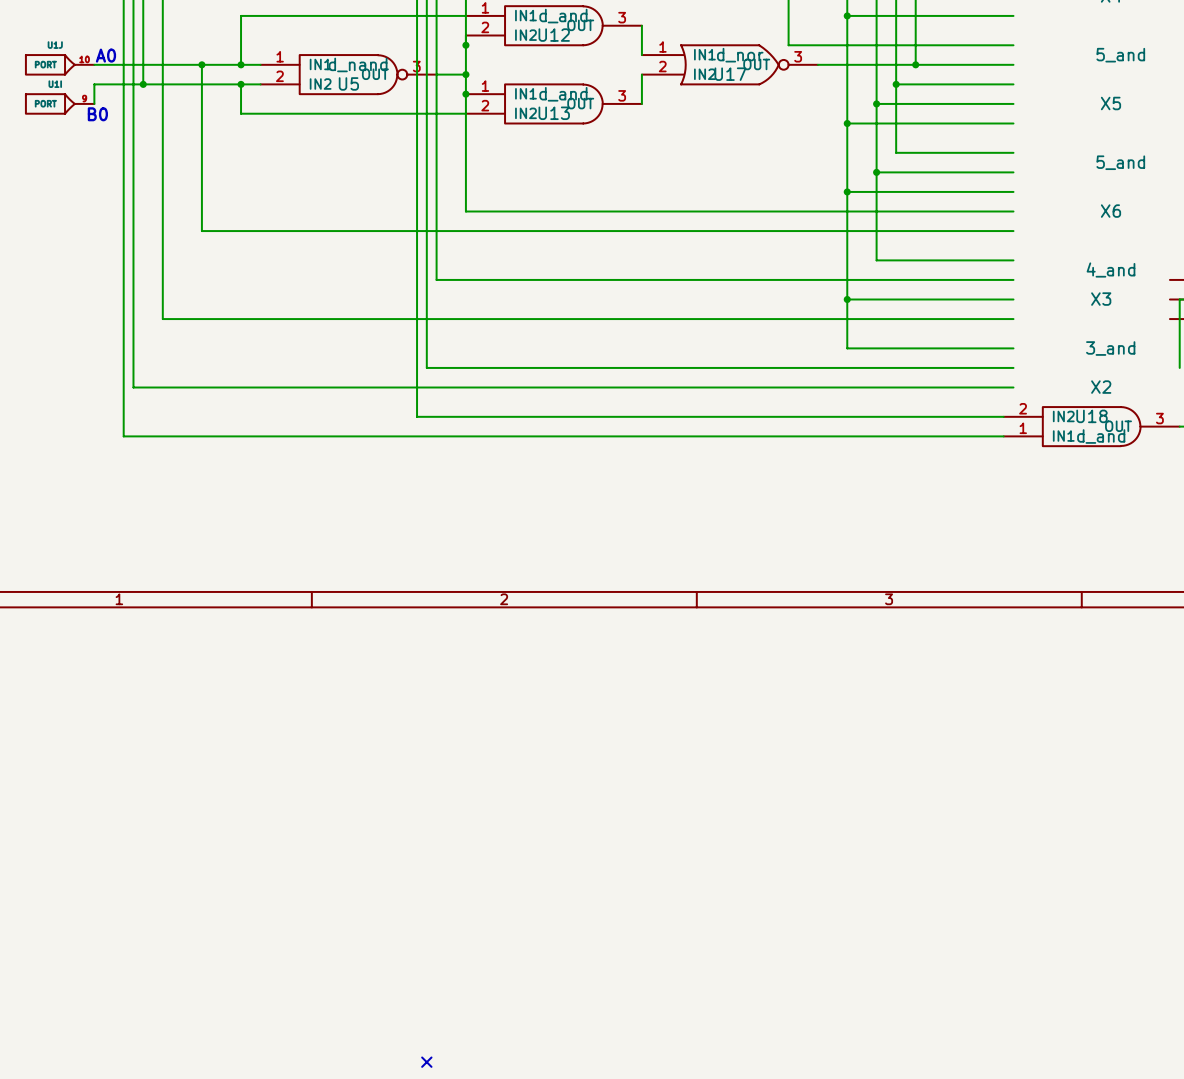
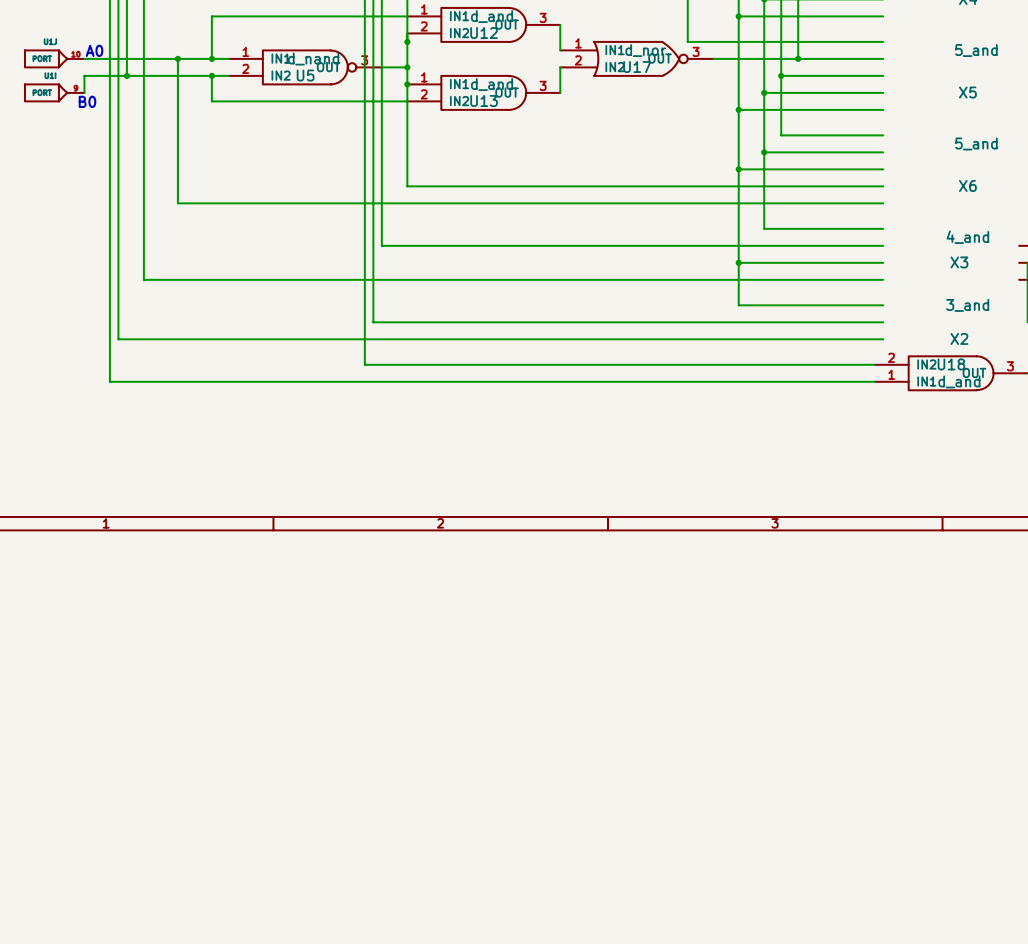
no-connect mark: (426, 1062) -> none

